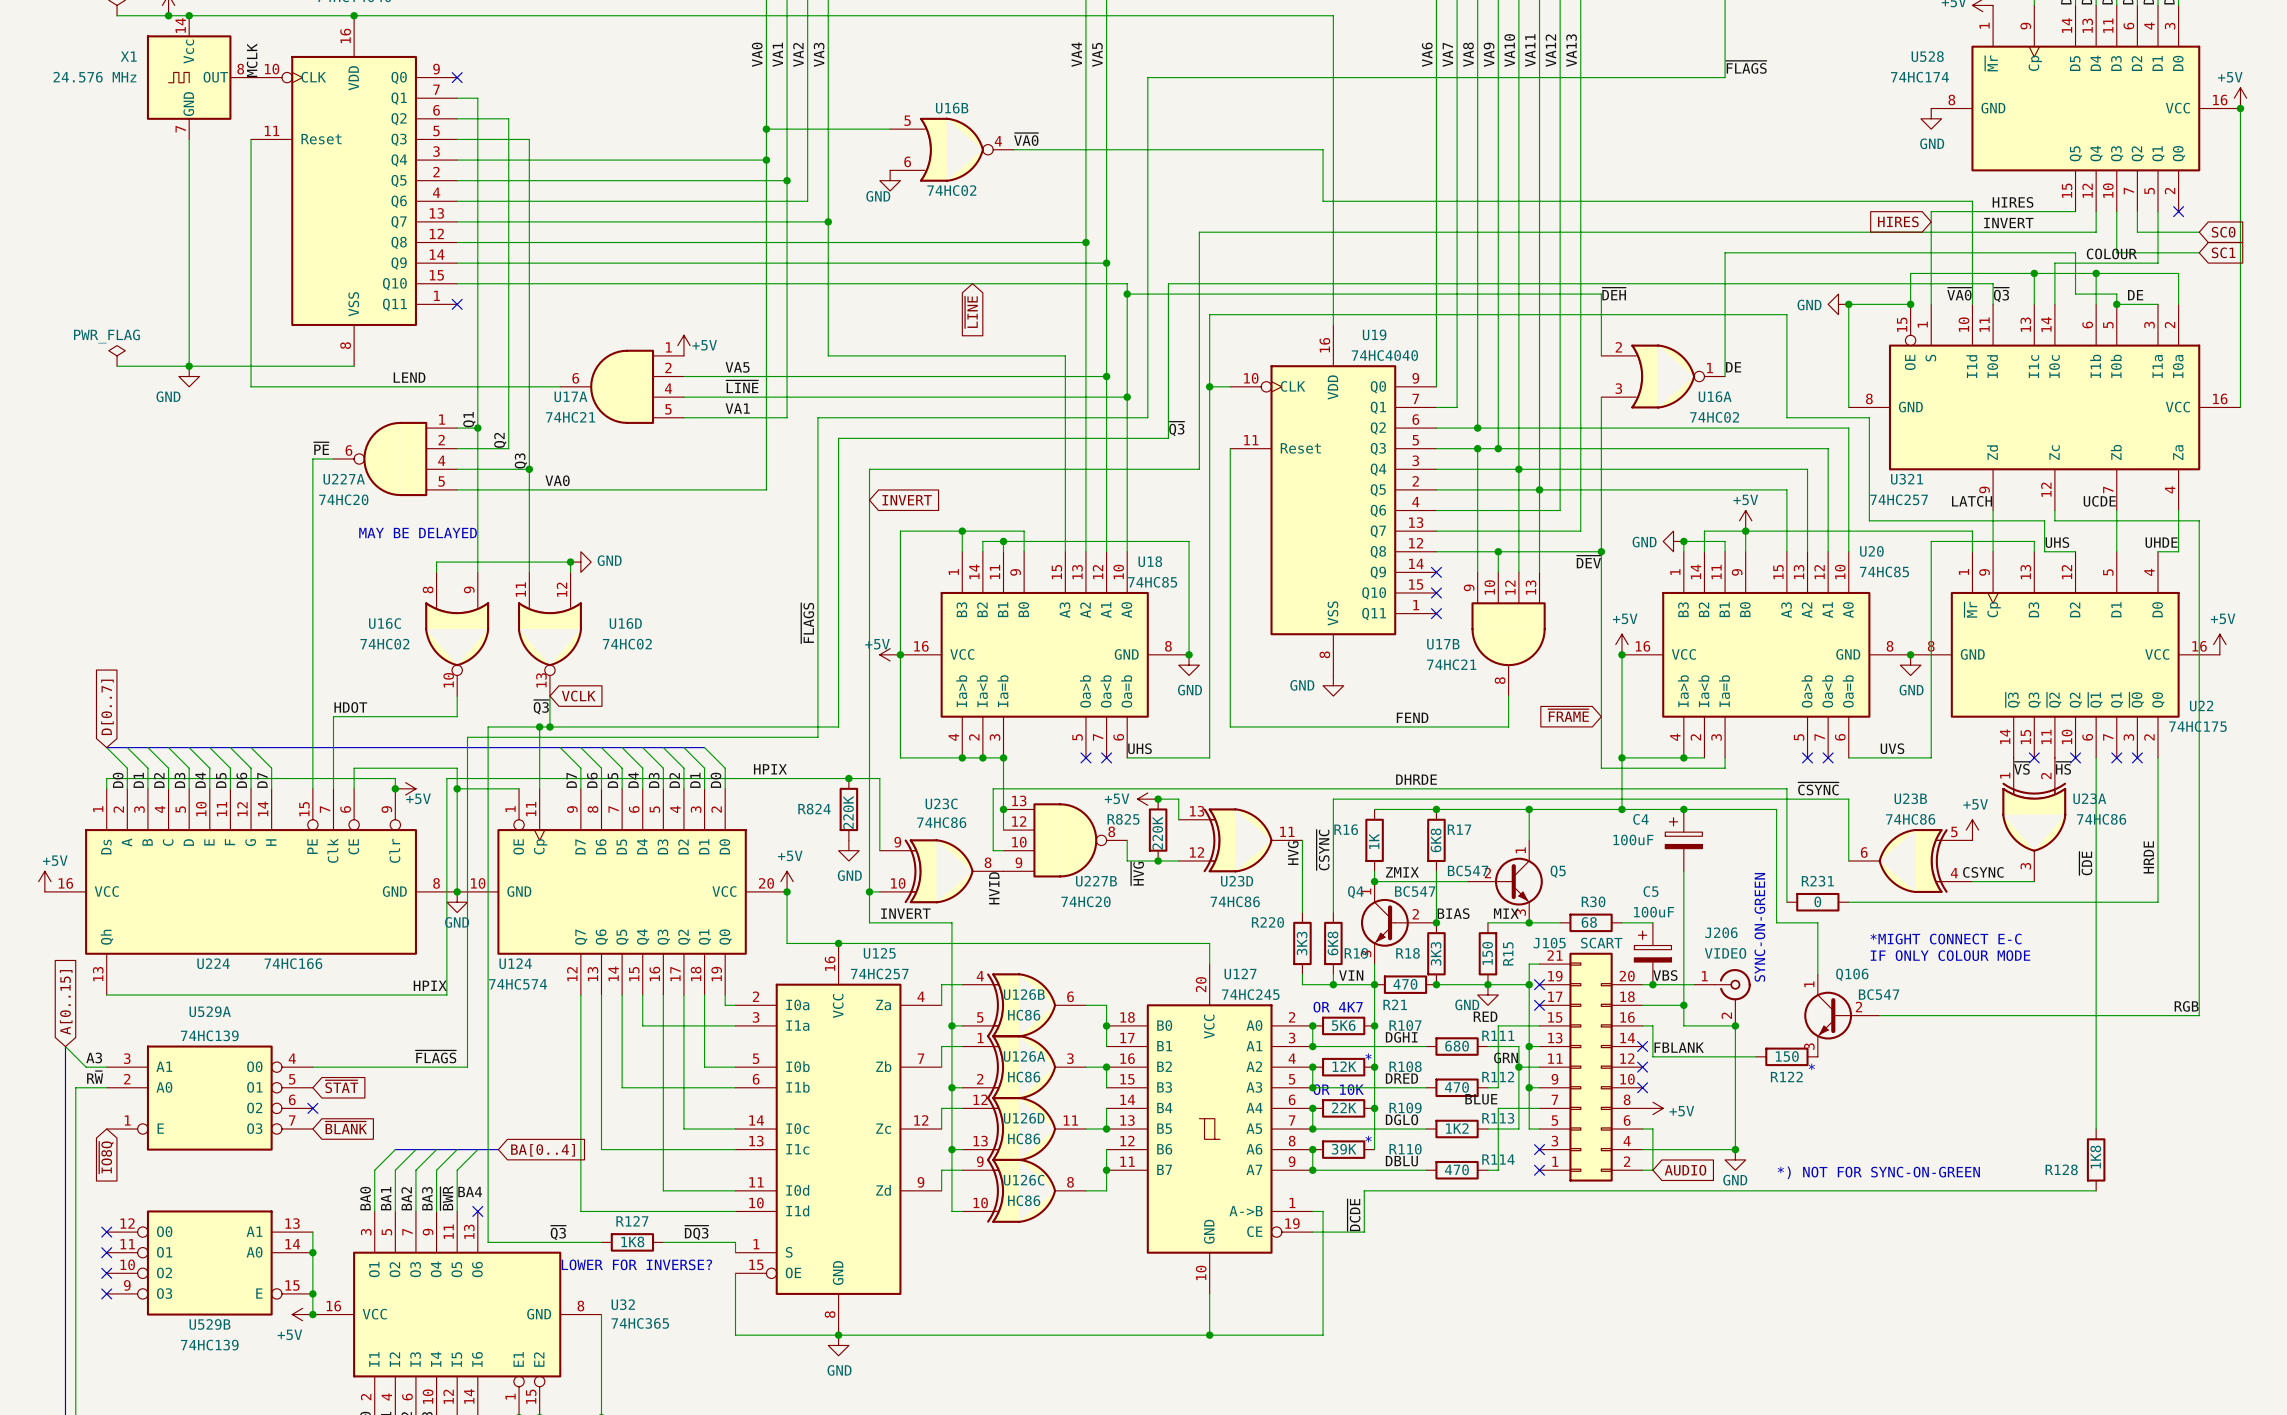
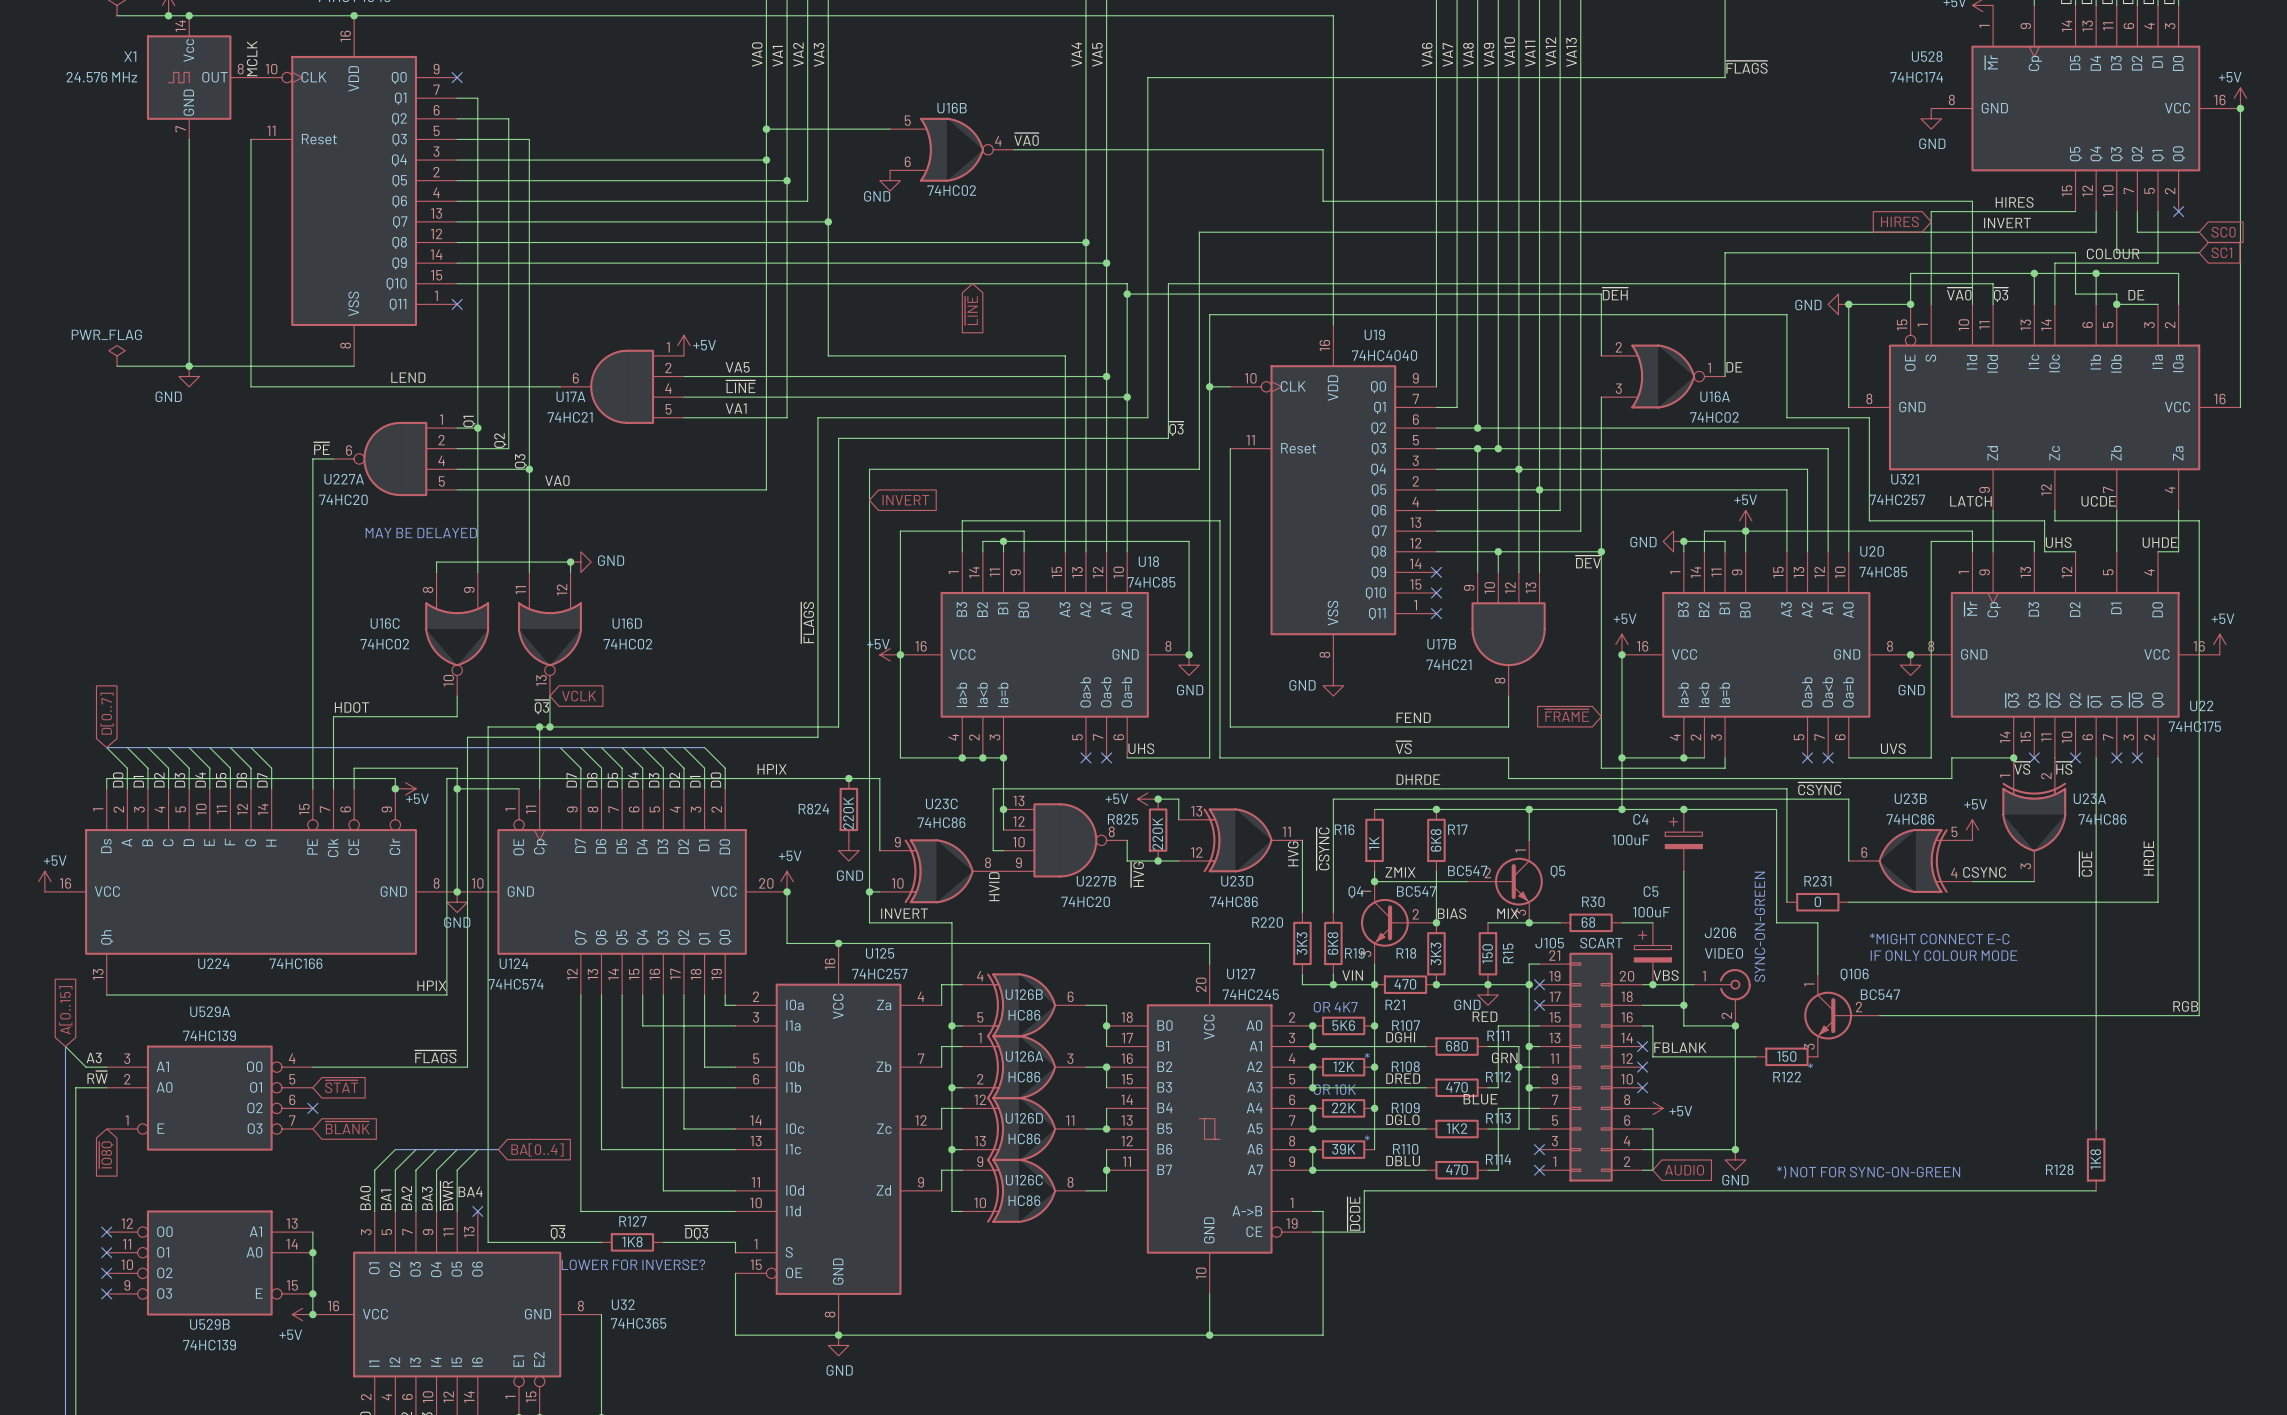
wire: none -> (962, 531) (962, 520) (1219, 520) (1219, 757) (1508, 757) (1508, 778) (1951, 778) (1951, 757) (2013, 757)
junction: (962, 531) -> none
label: none -> ~{VS} (1403, 747)
junction: none -> (2013, 757)

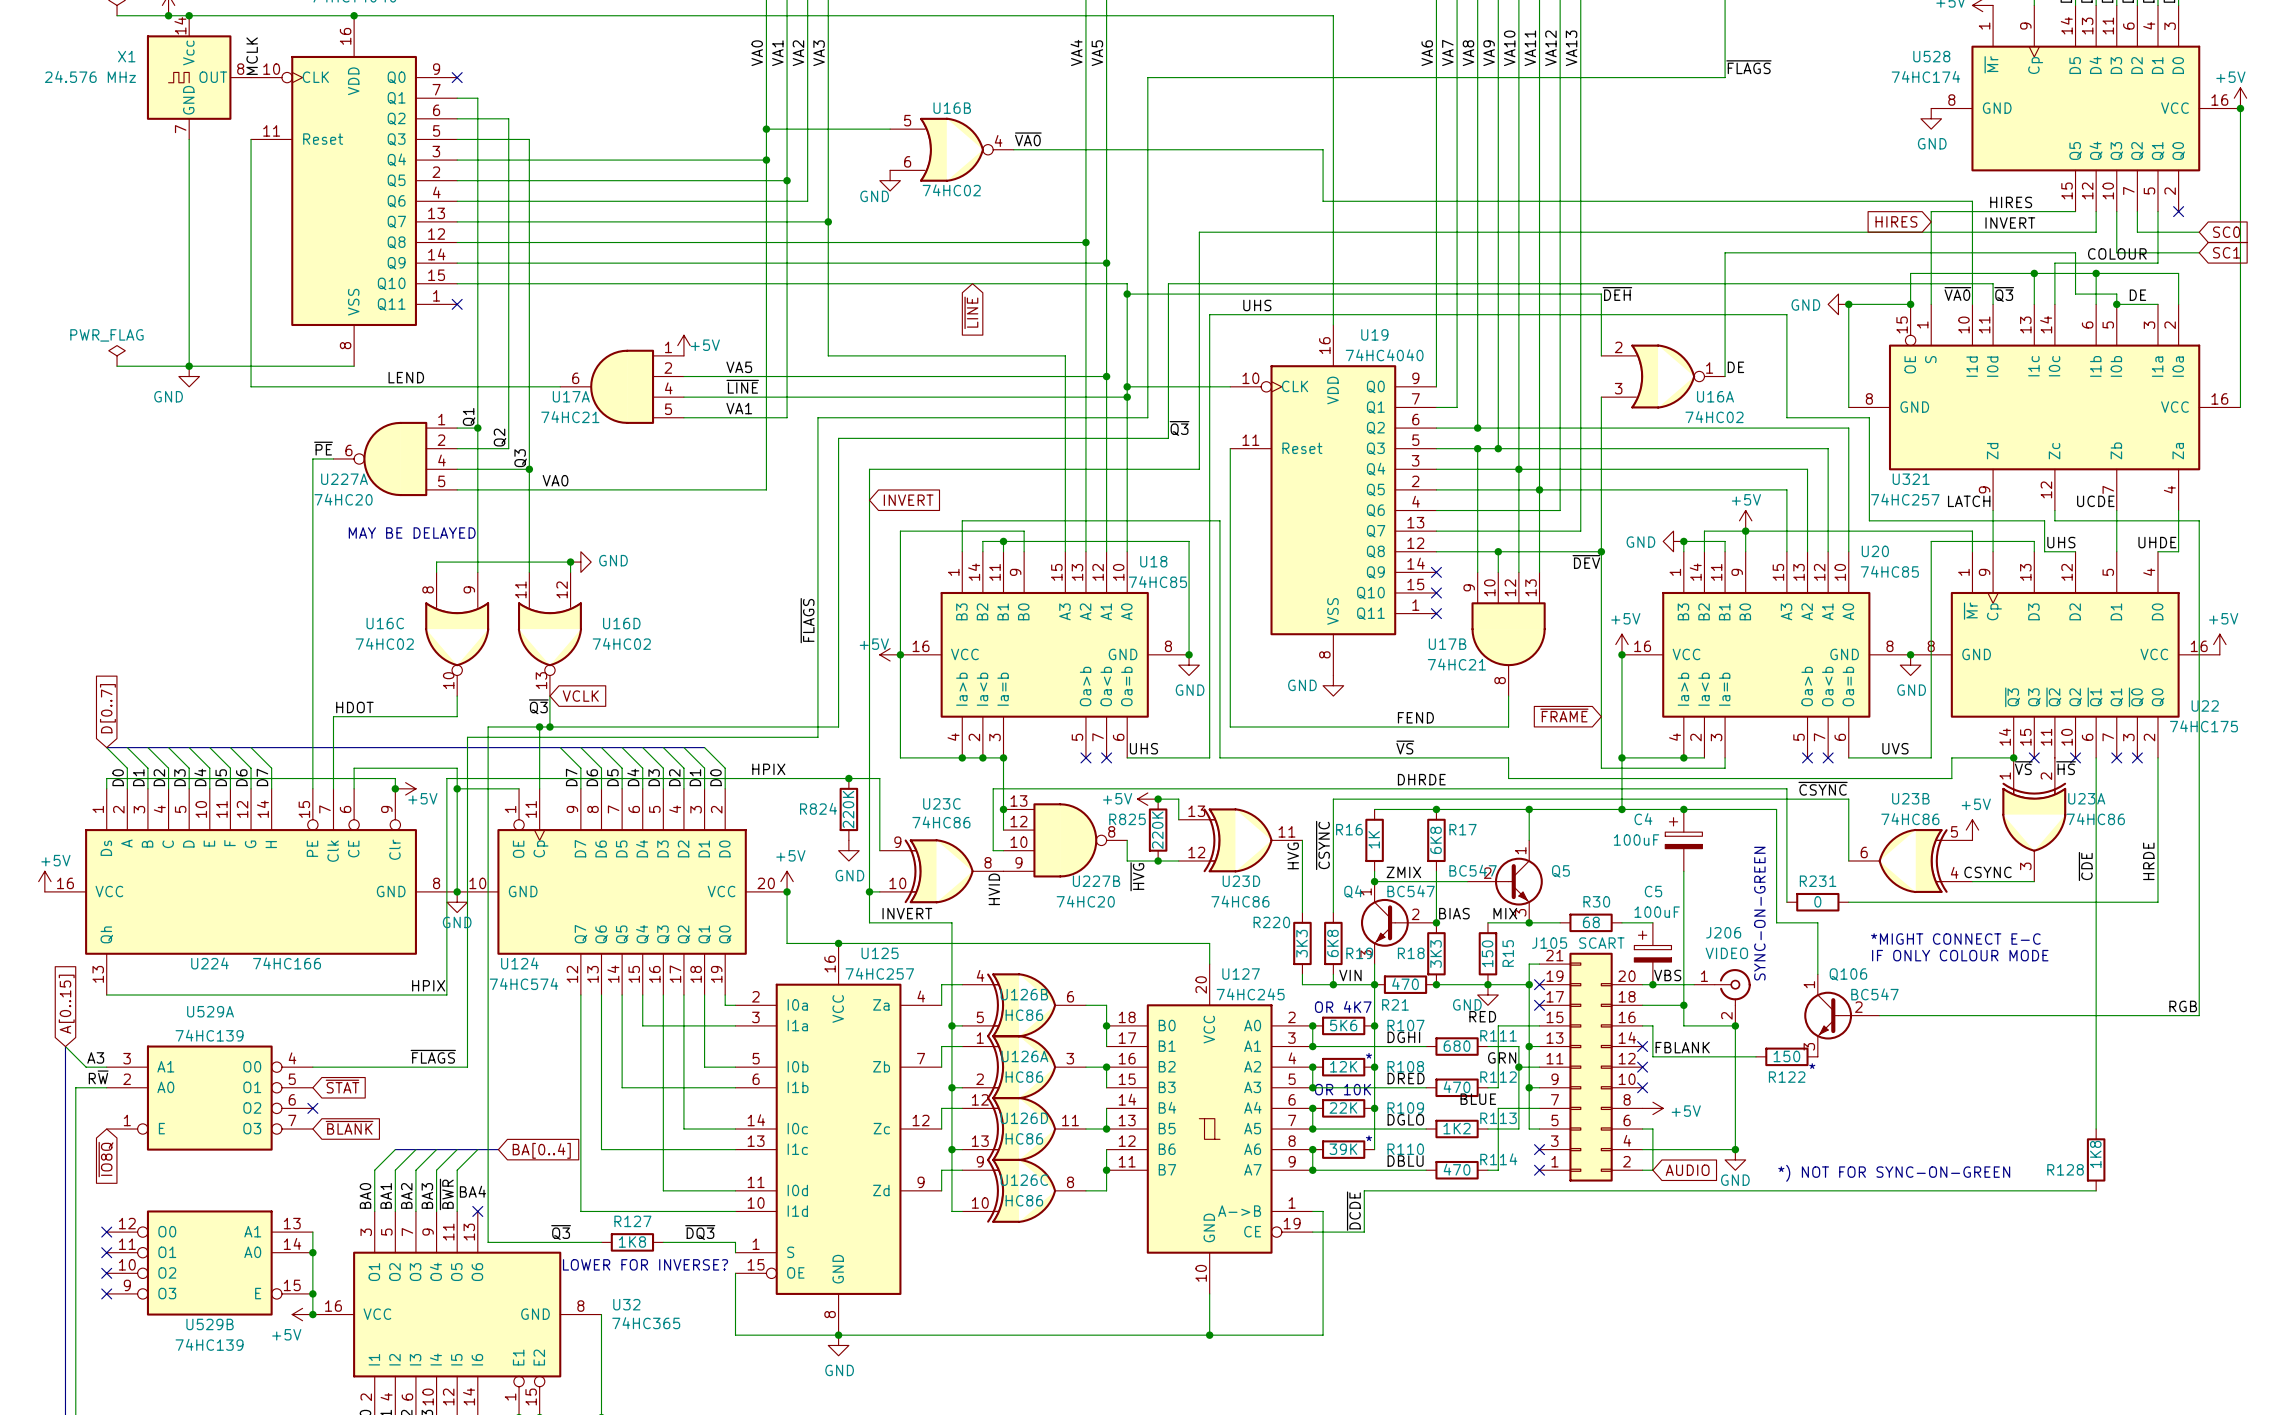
label: none -> UHS (1257, 305)
wire: none -> (1127, 386) (1209, 386)
junction: none -> (1127, 386)
junction: (1209, 386) -> none

